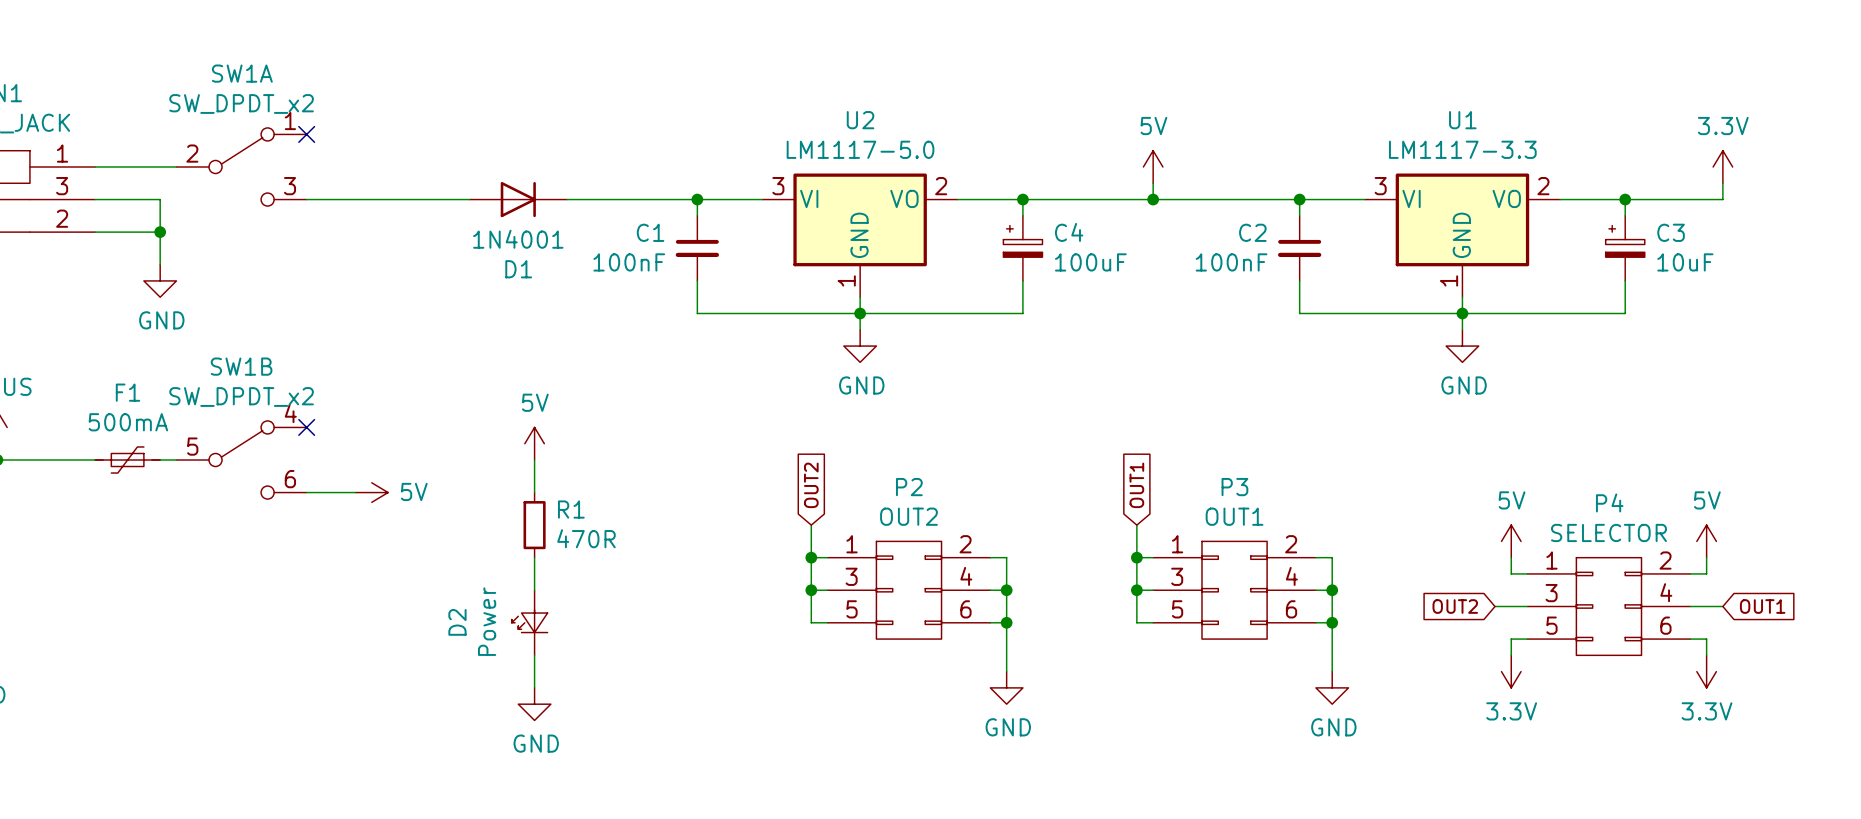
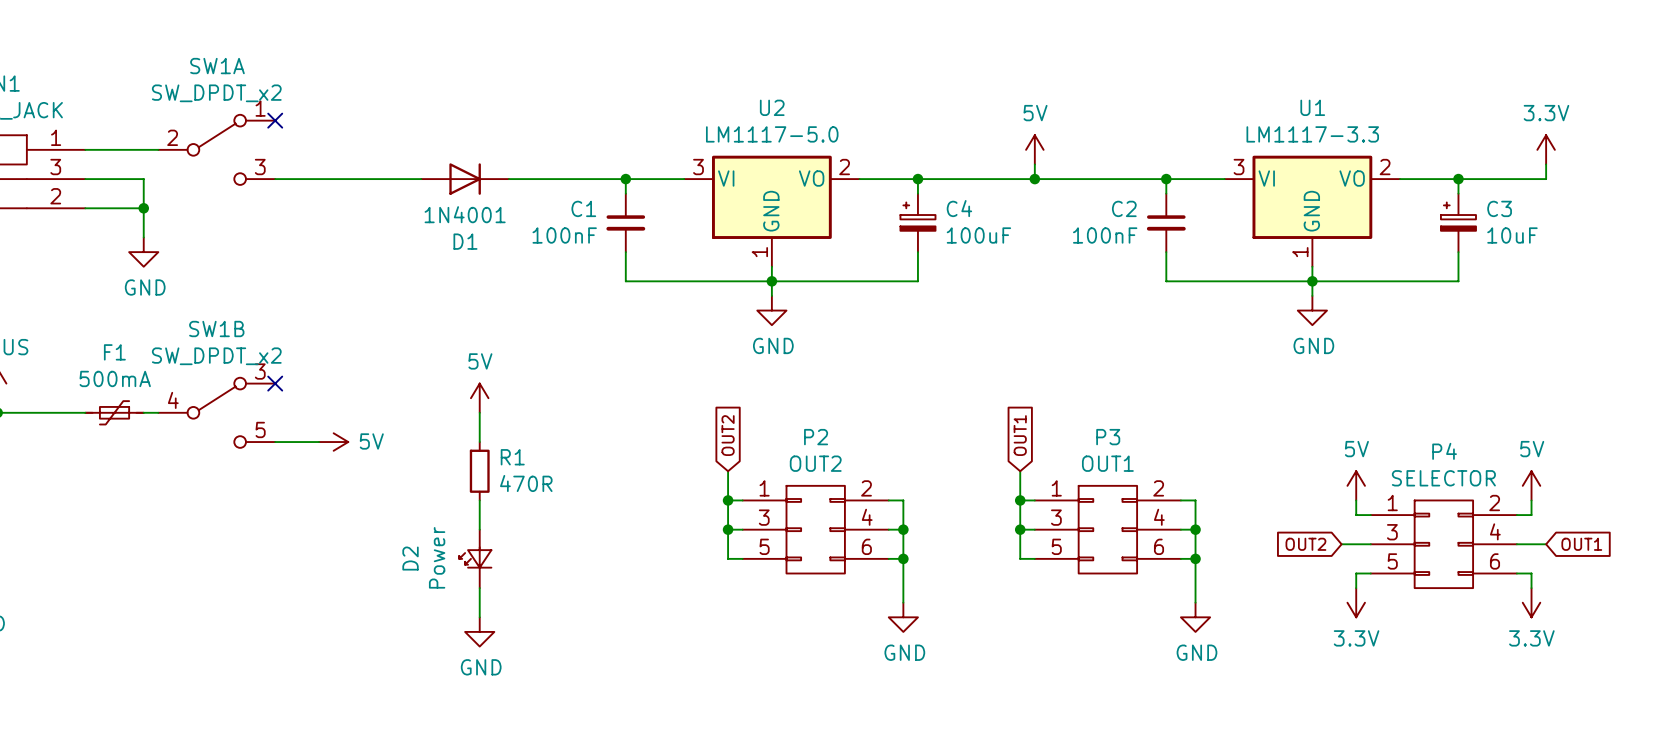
SW1B pin number: 4 (290, 413) -> 3 (260, 371)
SW1B pin number: 5 (192, 446) -> 4 (173, 400)
SW1B pin number: 6 (290, 479) -> 5 (260, 429)

